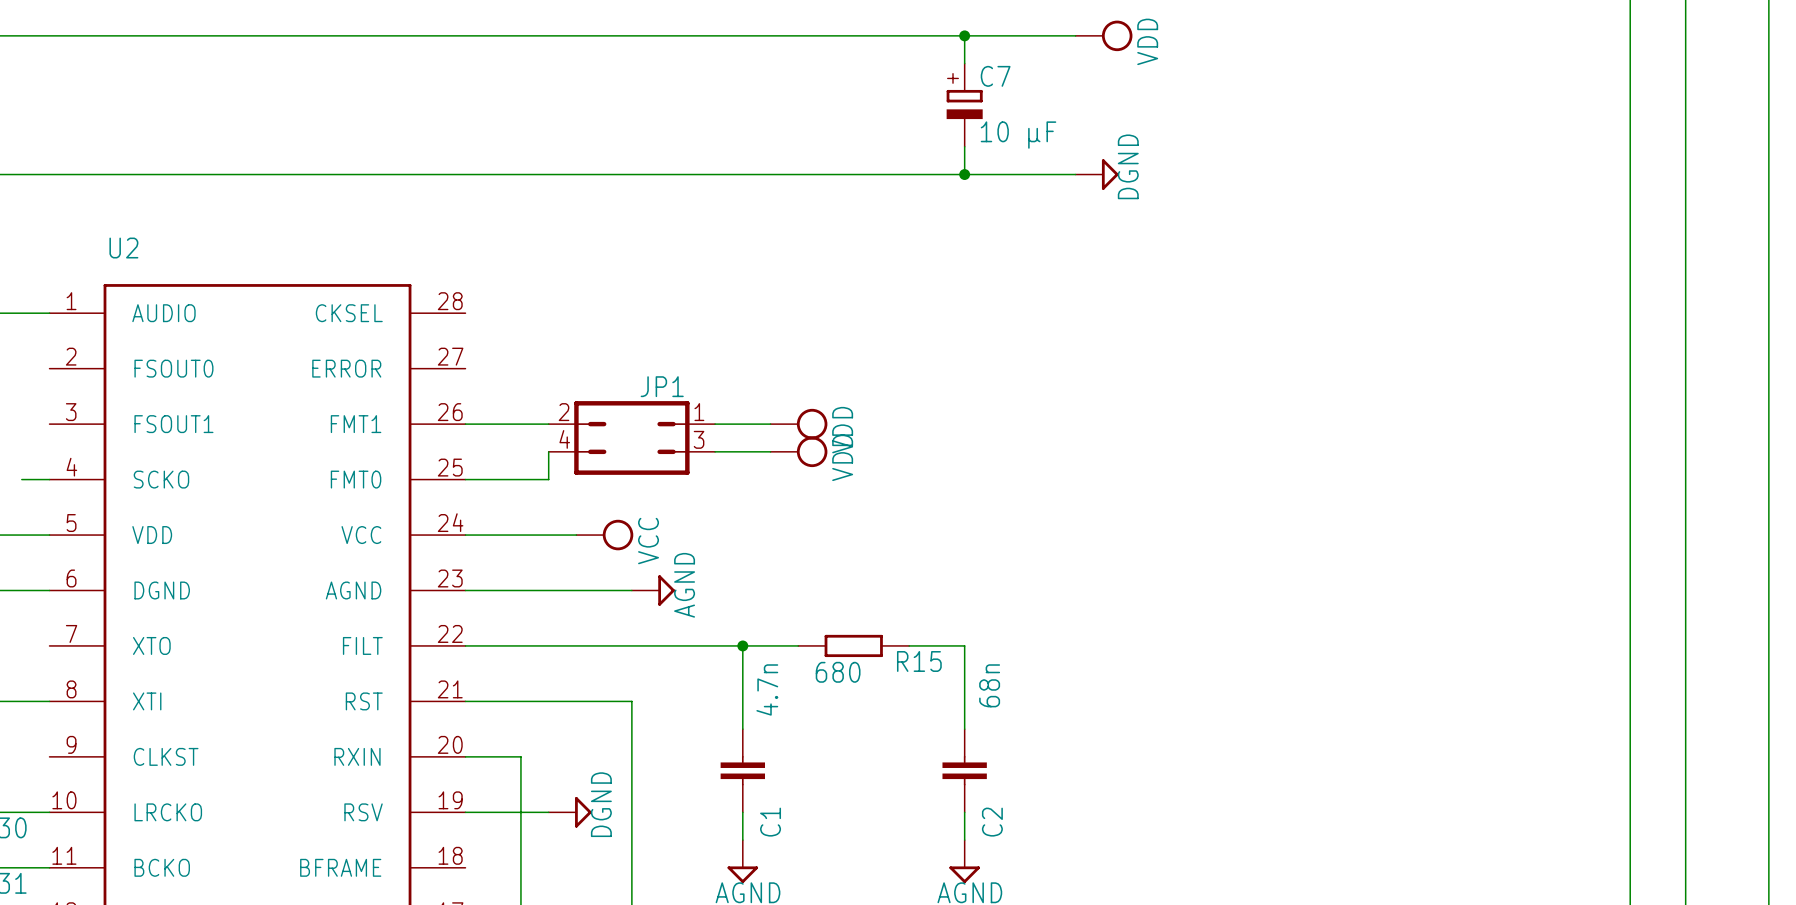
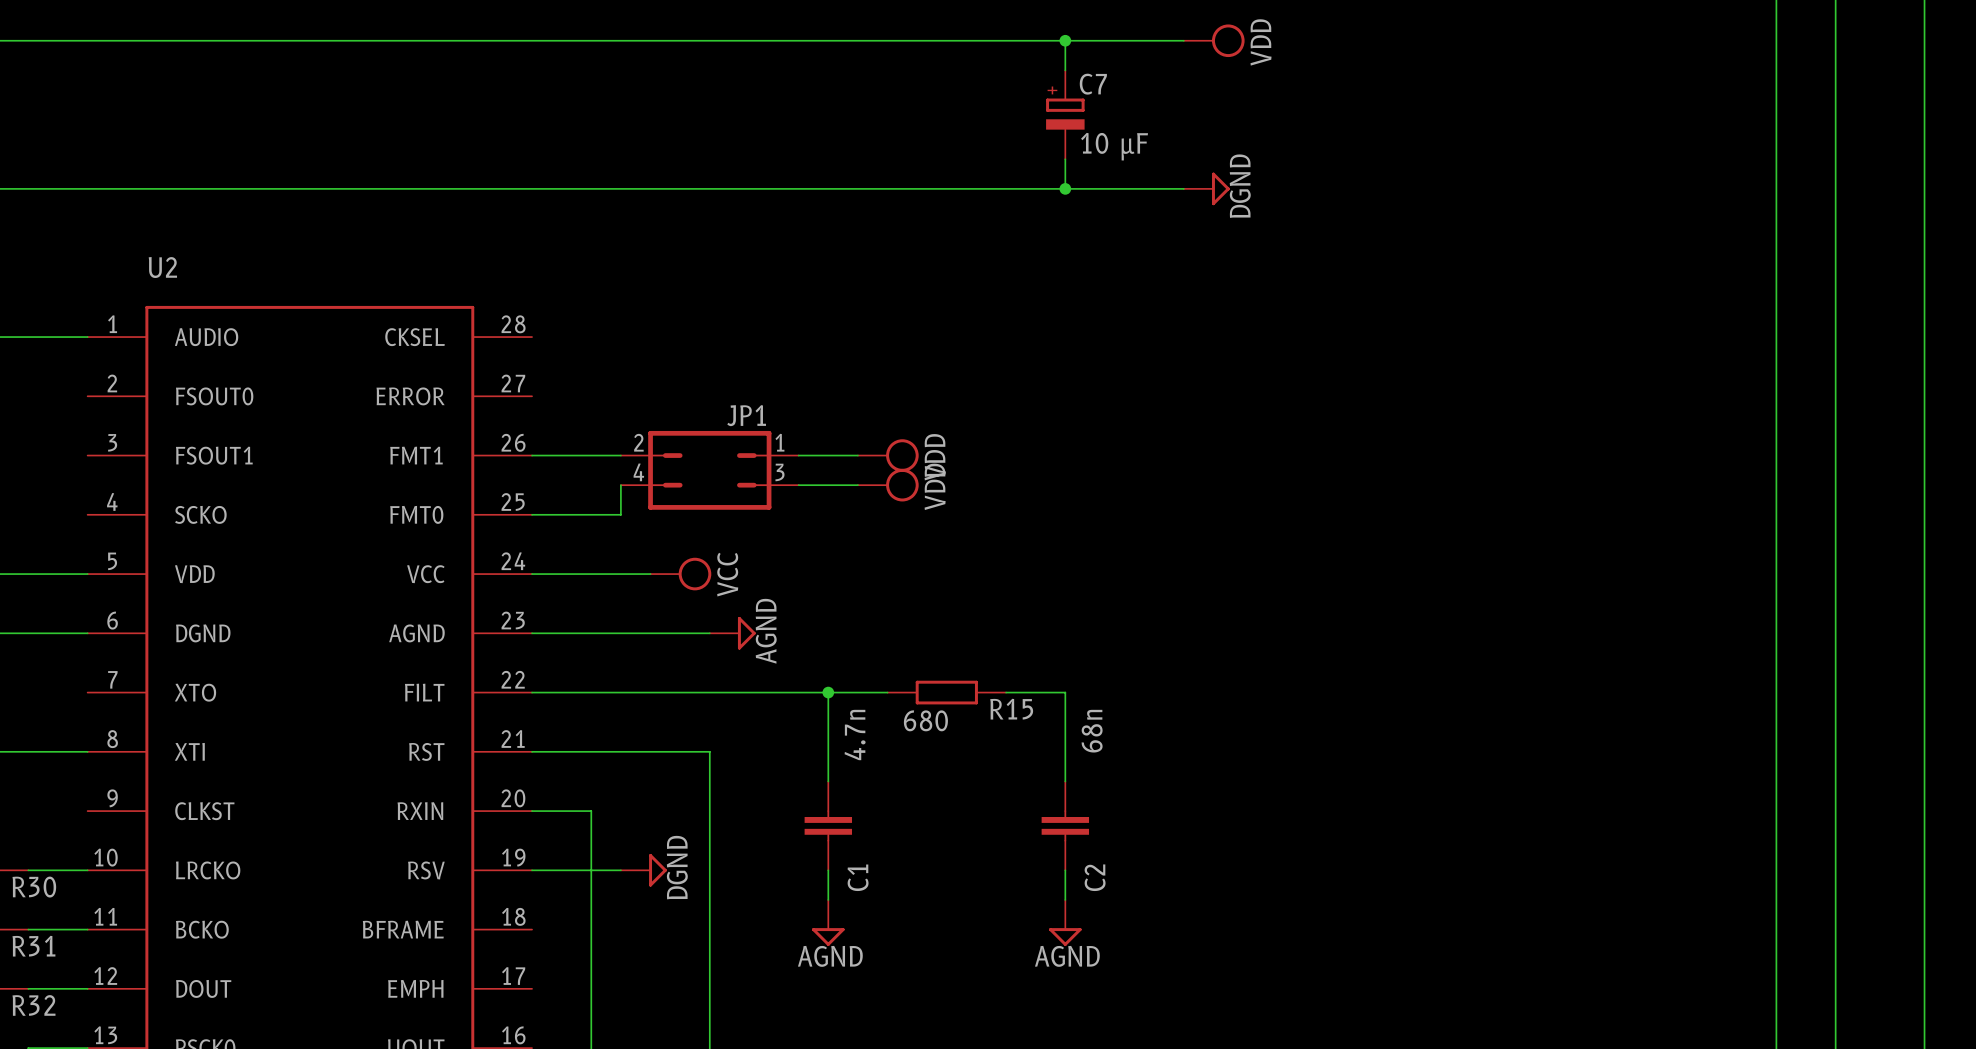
wire: (21, 479) (49, 479) -> none

